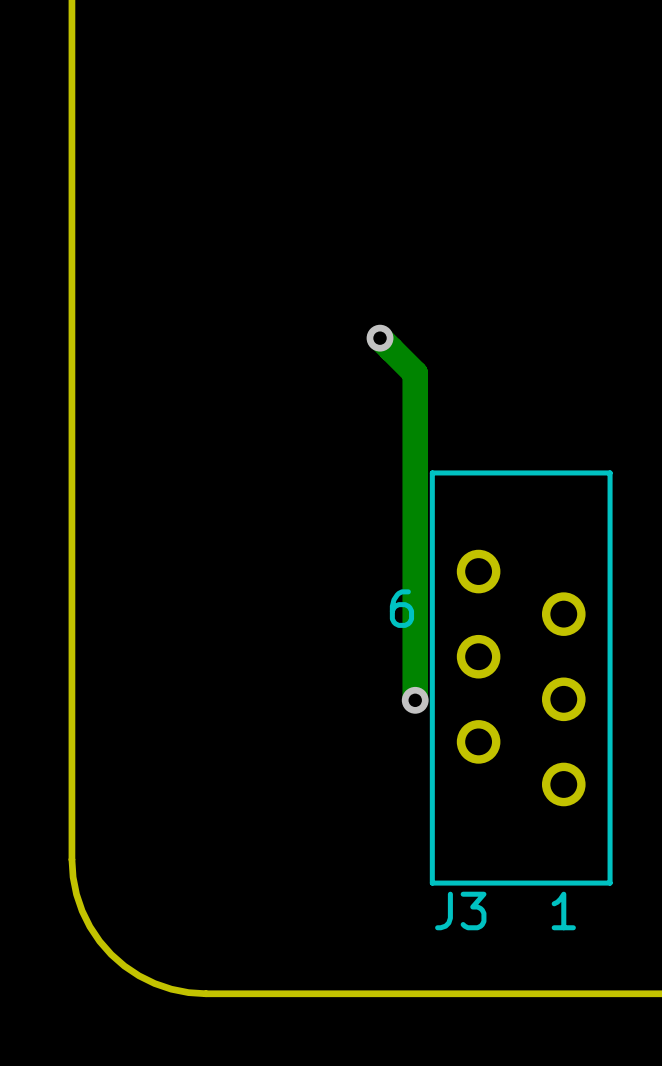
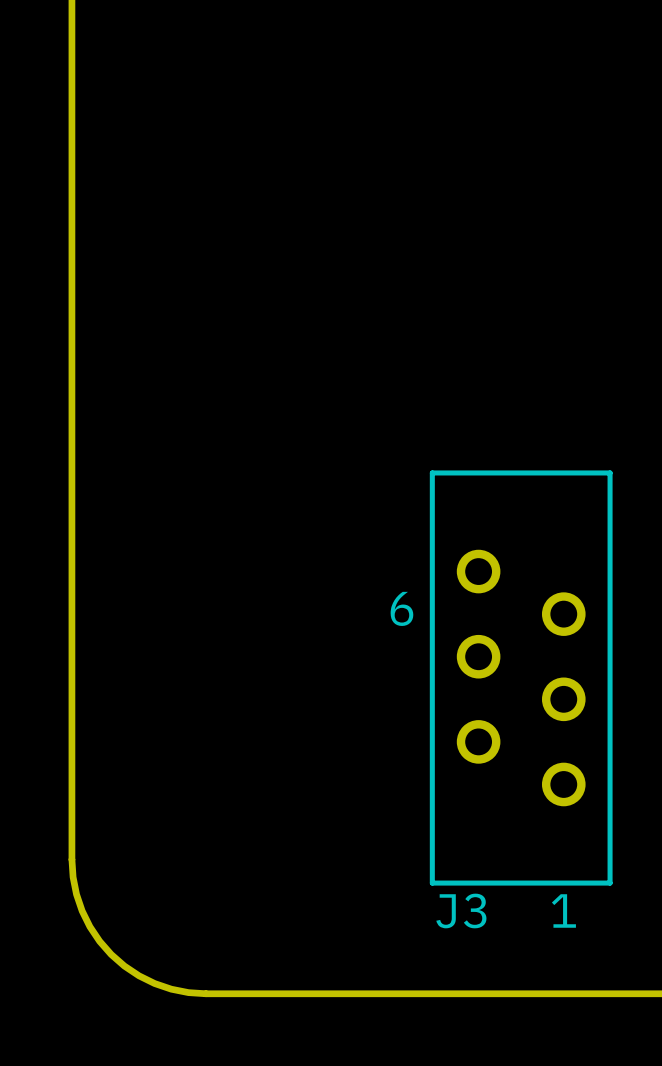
track: (380, 338) (415, 373) (415, 700) -> none
via: (380, 338) -> none
via: (415, 700) -> none

